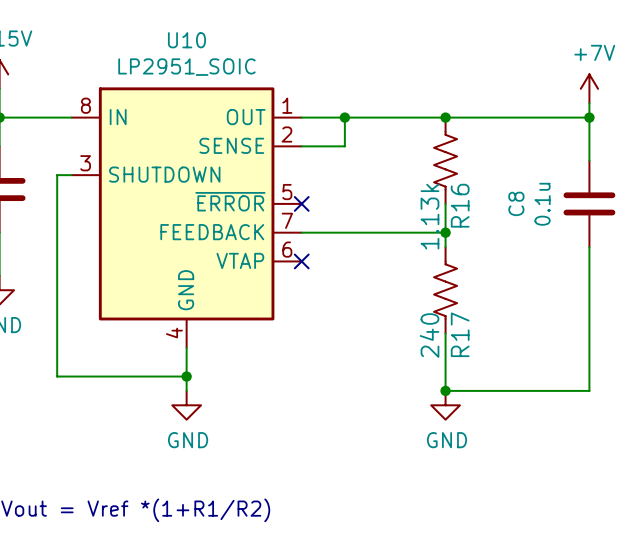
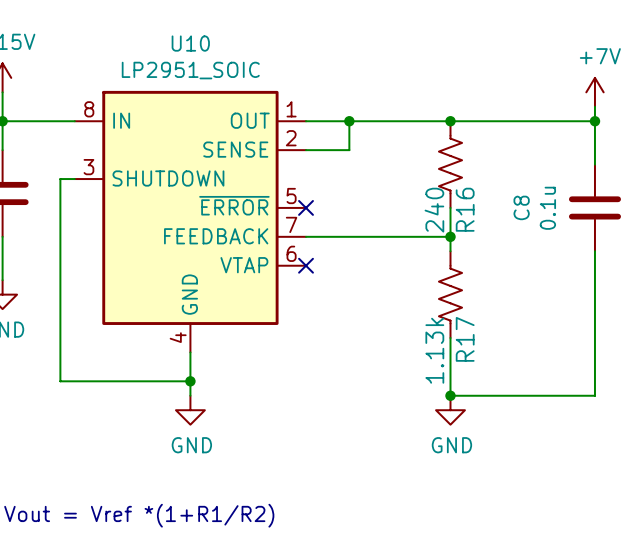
R16 value: 1.13k (429, 216) -> 240 (434, 210)
R17 value: 240 (429, 335) -> 1.13k (434, 350)

